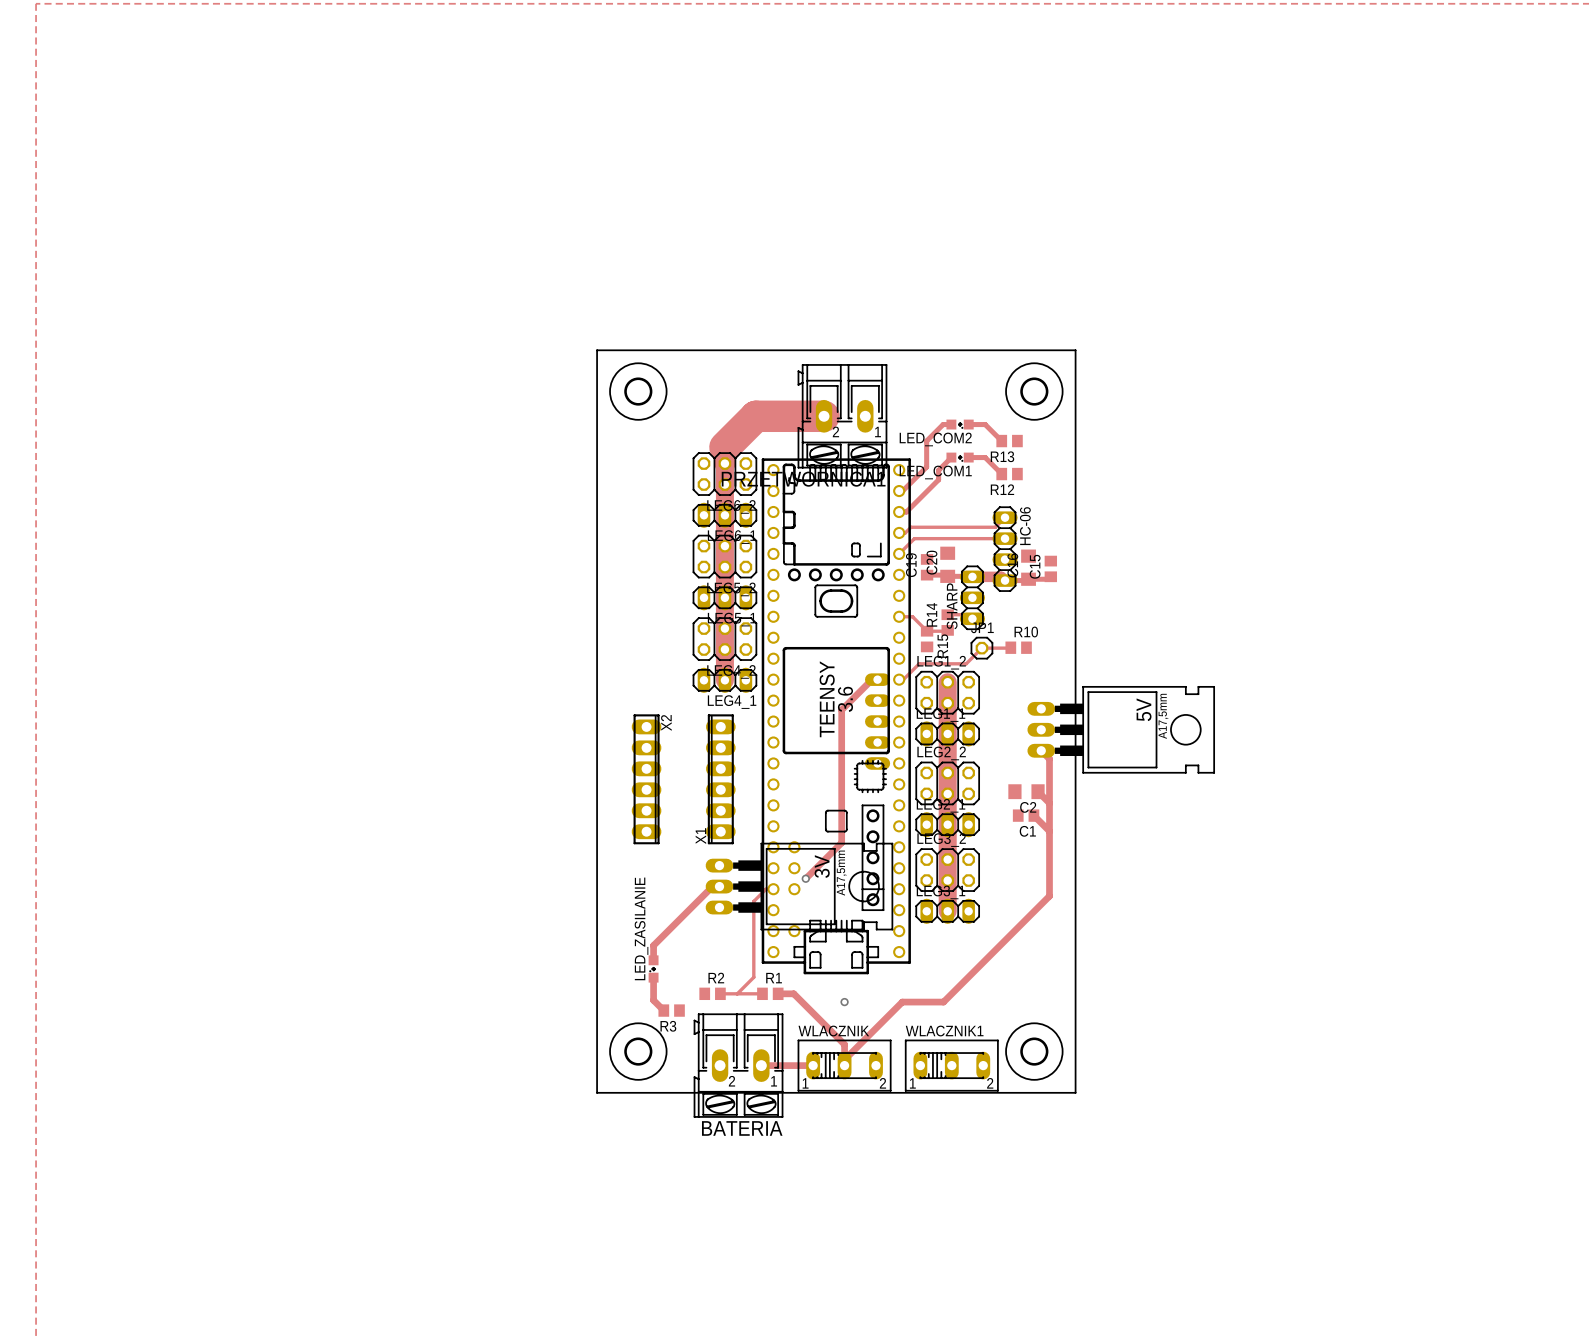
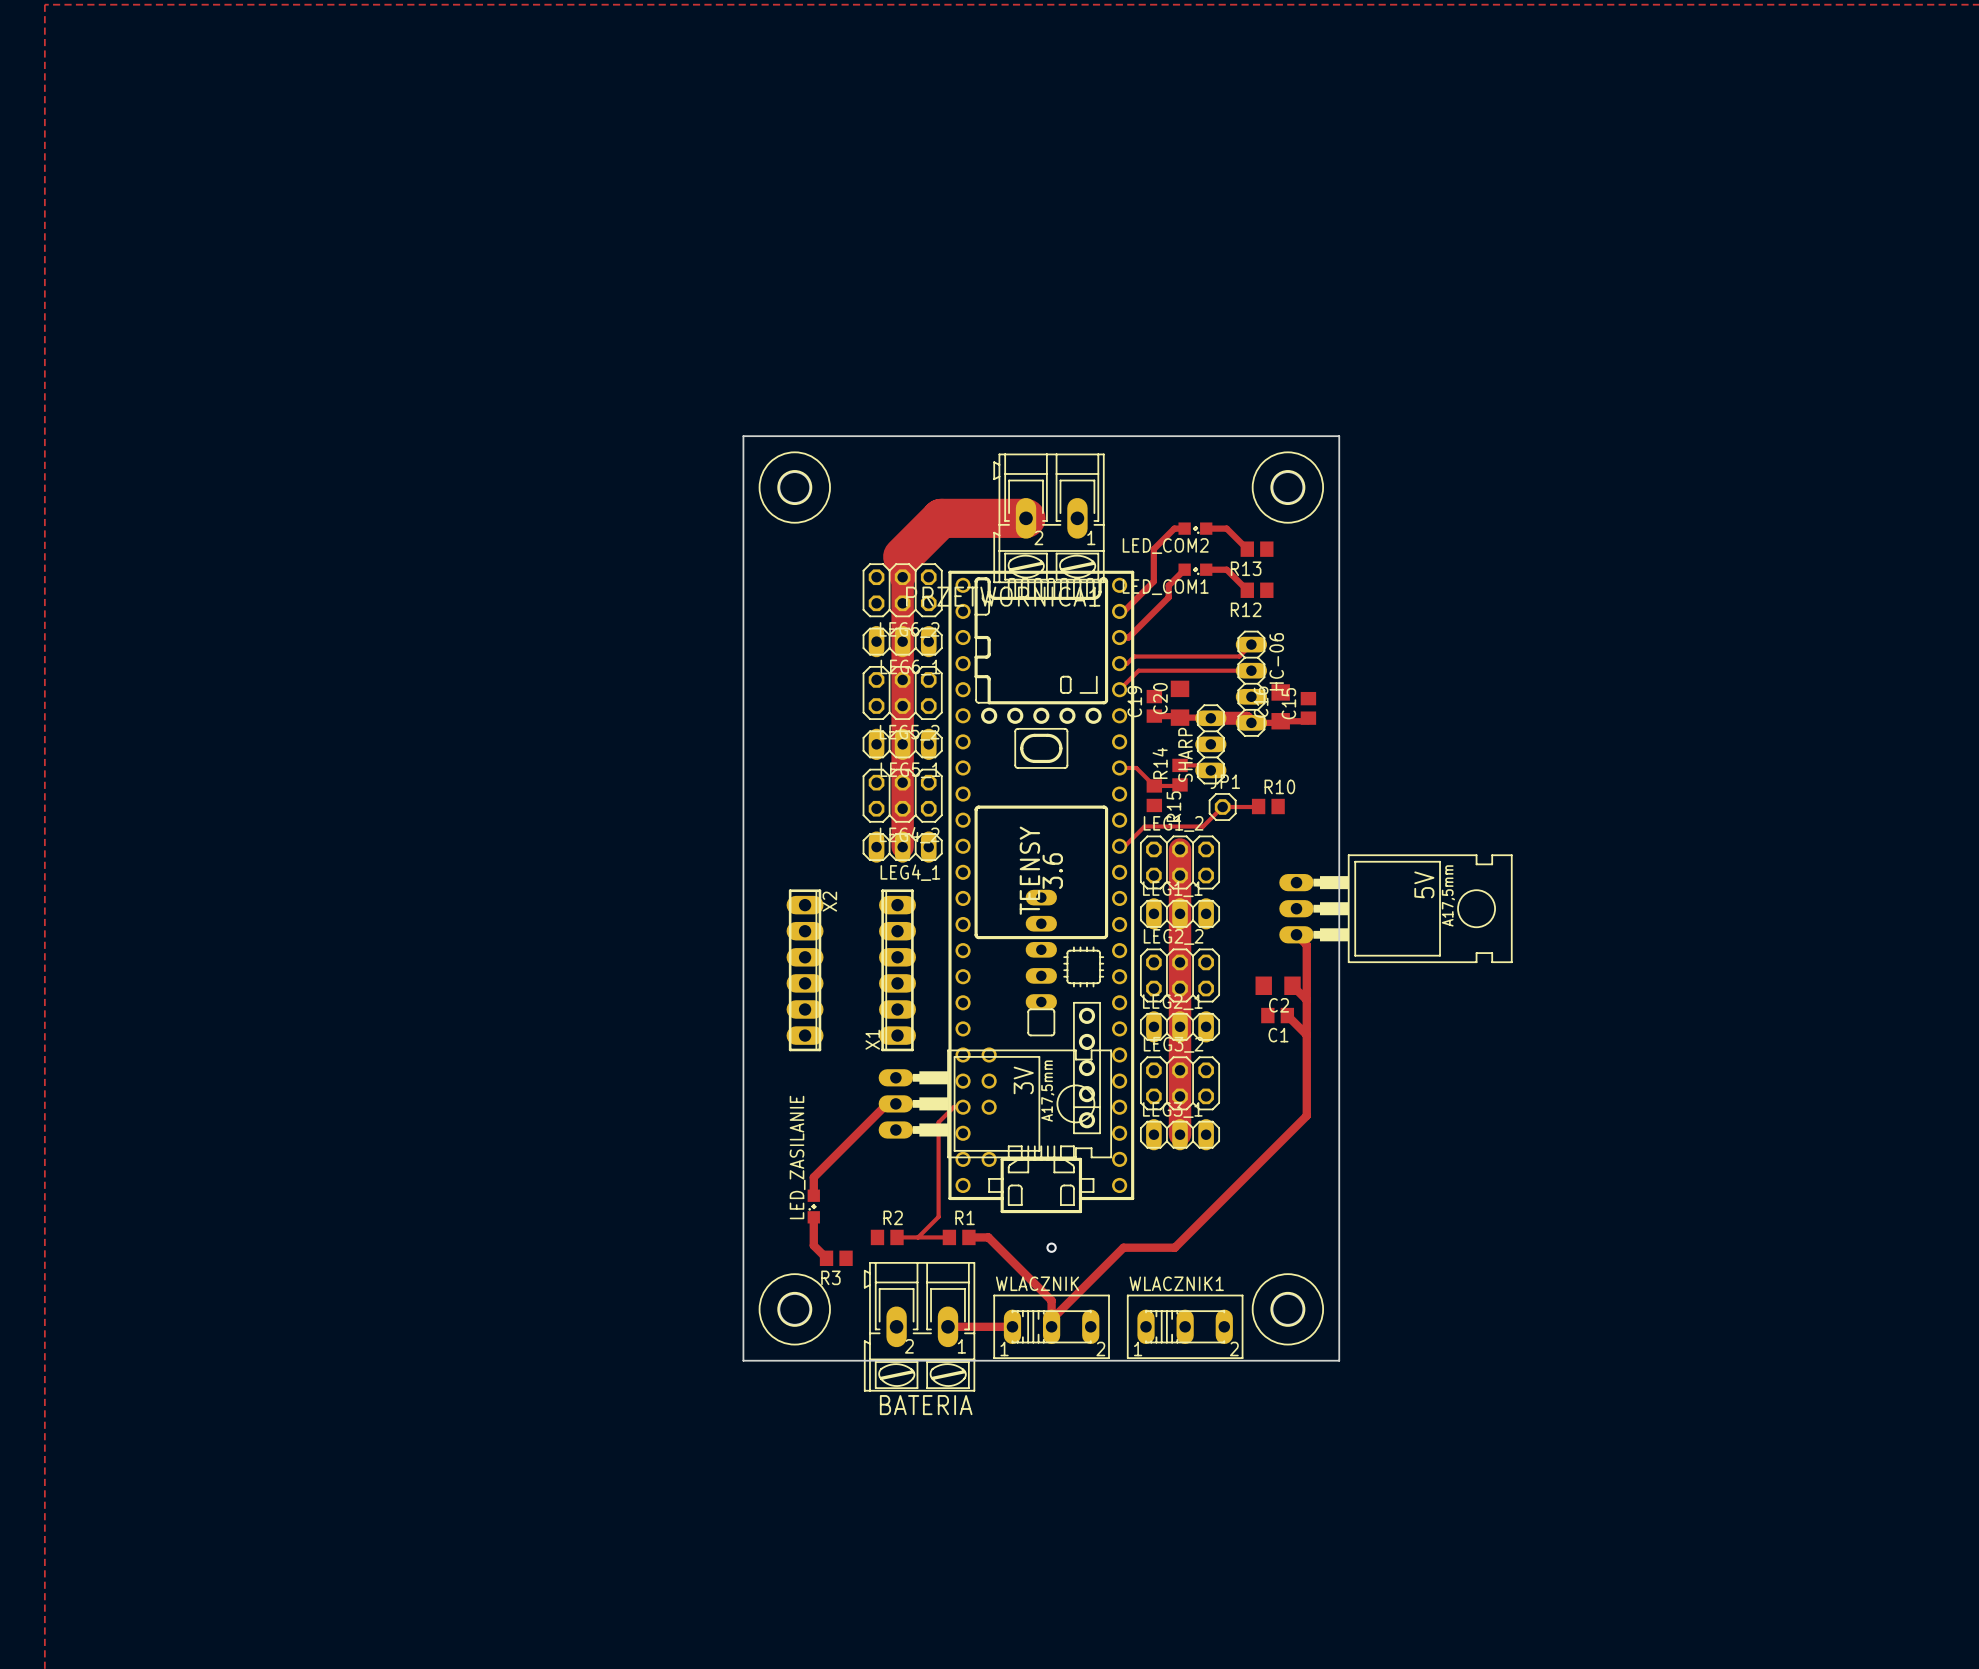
track: (877, 679) (872, 679) (841, 710) (841, 842) (805, 878) -> none
part position: (877, 721) -> (1041, 949)
via: (805, 878) -> none

